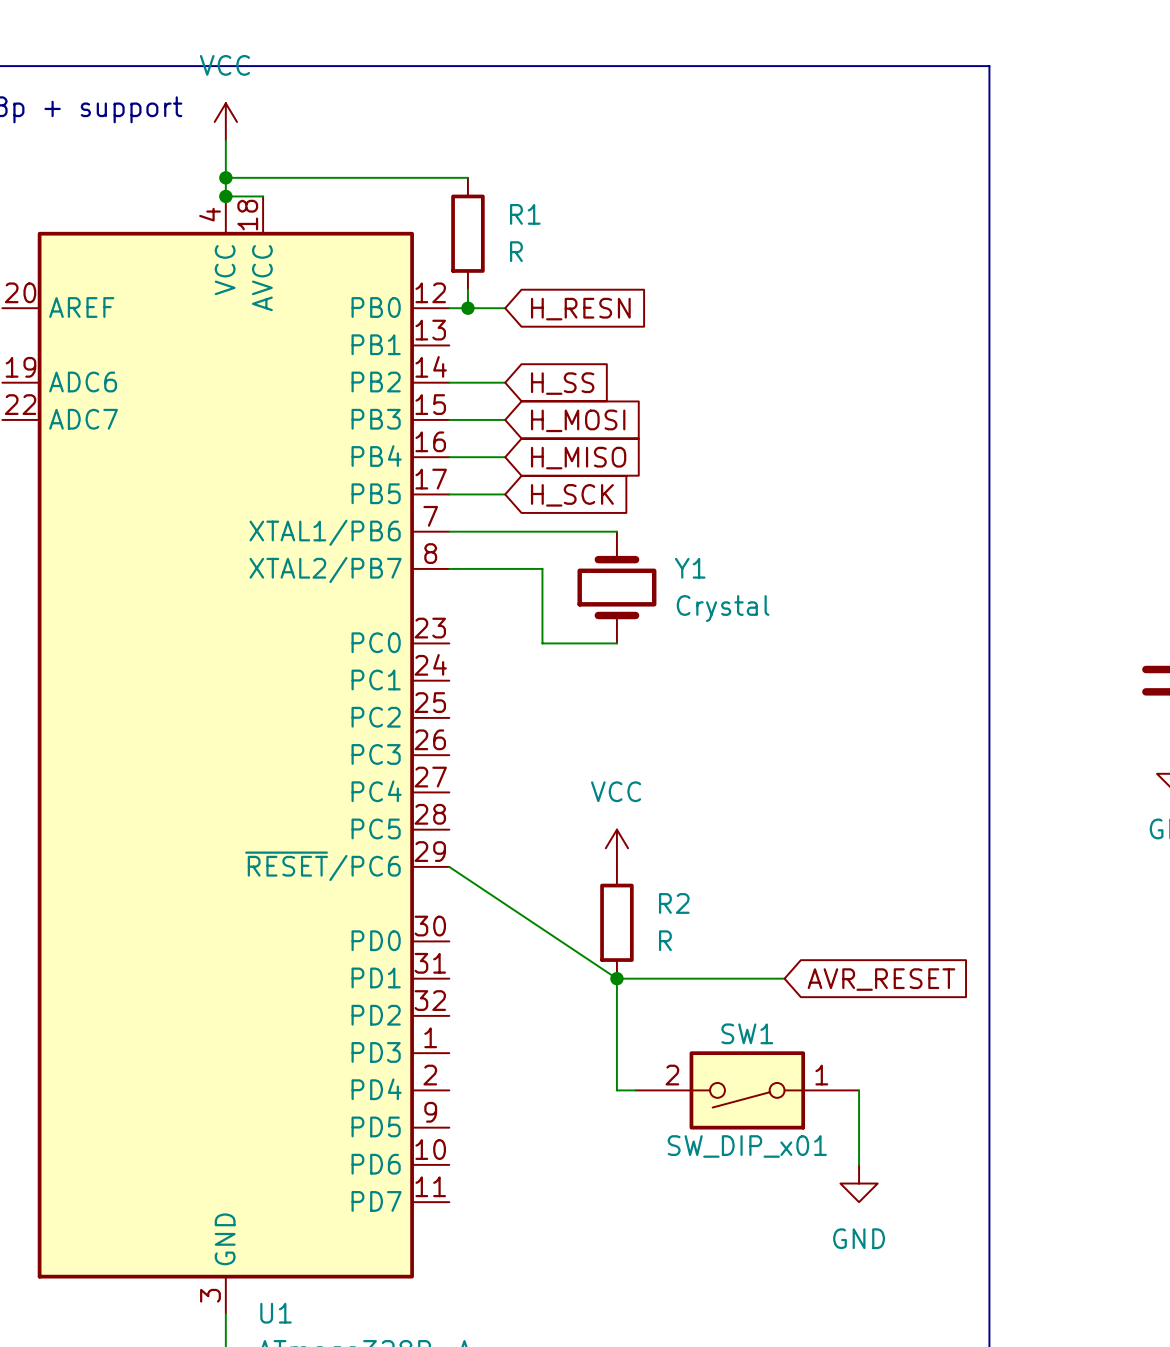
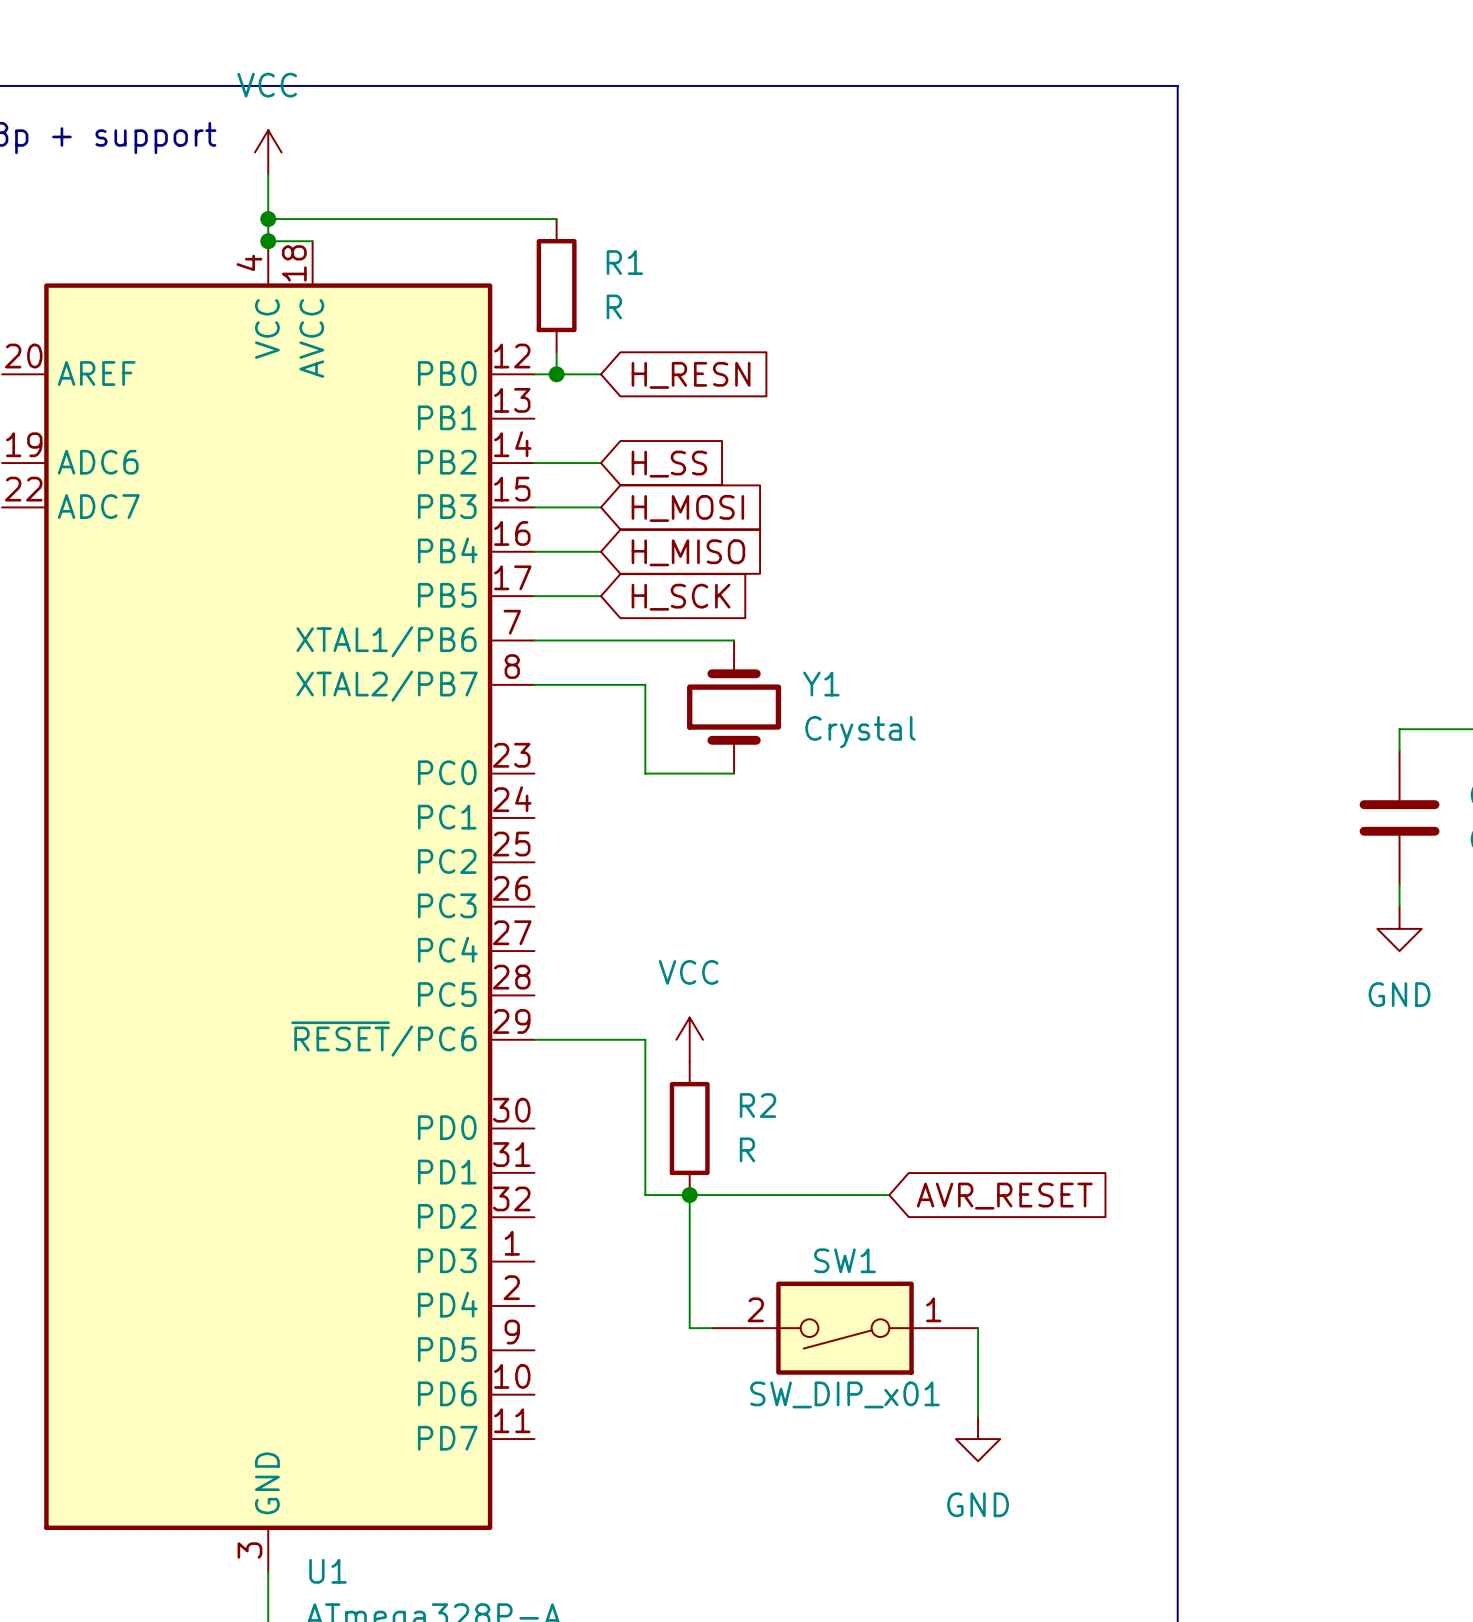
power symbol position: VCC (616, 848) -> VCC (689, 1039)
wire: (449, 866) (616, 978) -> (534, 1039) (645, 1039) (645, 1195) (889, 1195)
R2 position: (616, 922) -> (689, 1128)
wire: (616, 978) (616, 1090) (635, 1090) -> (689, 1195) (689, 1328) (711, 1328)
wire: (616, 978) (784, 978) -> none
junction position: (616, 978) -> (689, 1195)
global label position: AVR_RESET (881, 979) -> AVR_RESET (1004, 1196)
SW1 position: (747, 1090) -> (844, 1328)
wire: (859, 1090) (859, 1164) -> (978, 1328) (978, 1416)
power symbol position: GND (859, 1183) -> GND (978, 1439)

